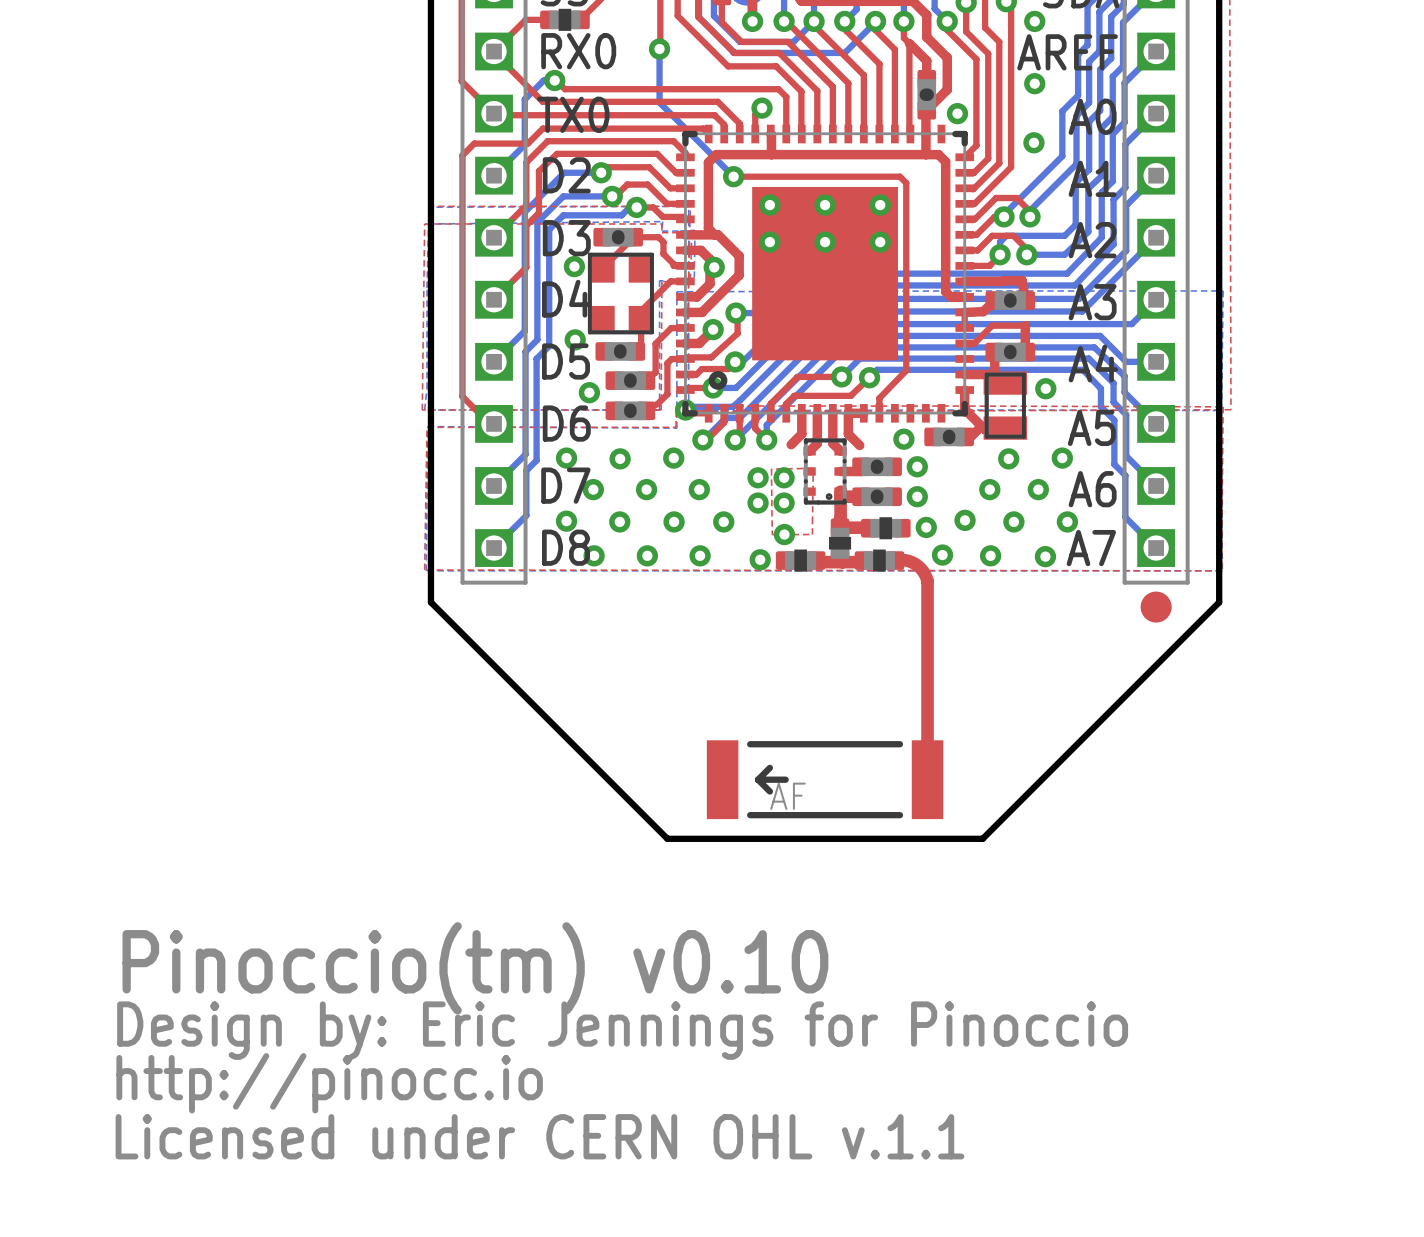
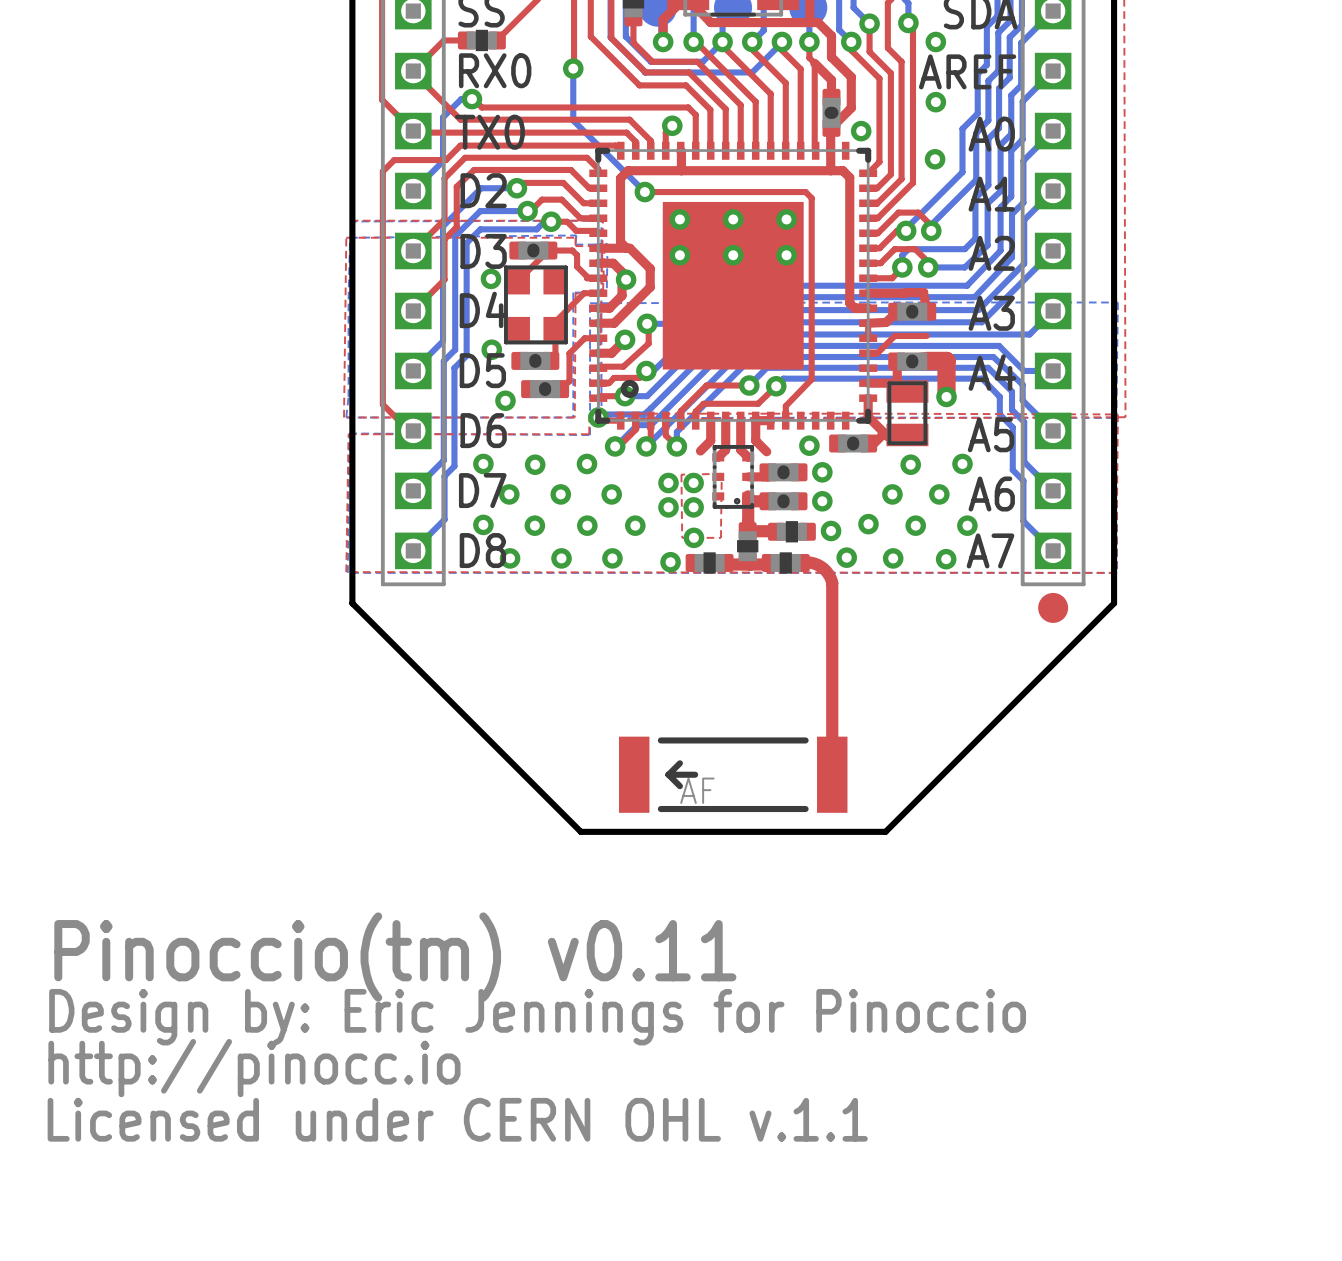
top track: (1025, 325) (1025, 351) -> (946, 396) (946, 360) (926, 360)
top track: (685, 358) (671, 358) (667, 363) (667, 394) (657, 403) (645, 410) -> none
part: (630, 410) -> none
text: Pinoccio(tm) v0.10 (475, 968) -> Pinoccio(tm) v0.11 (395, 957)

